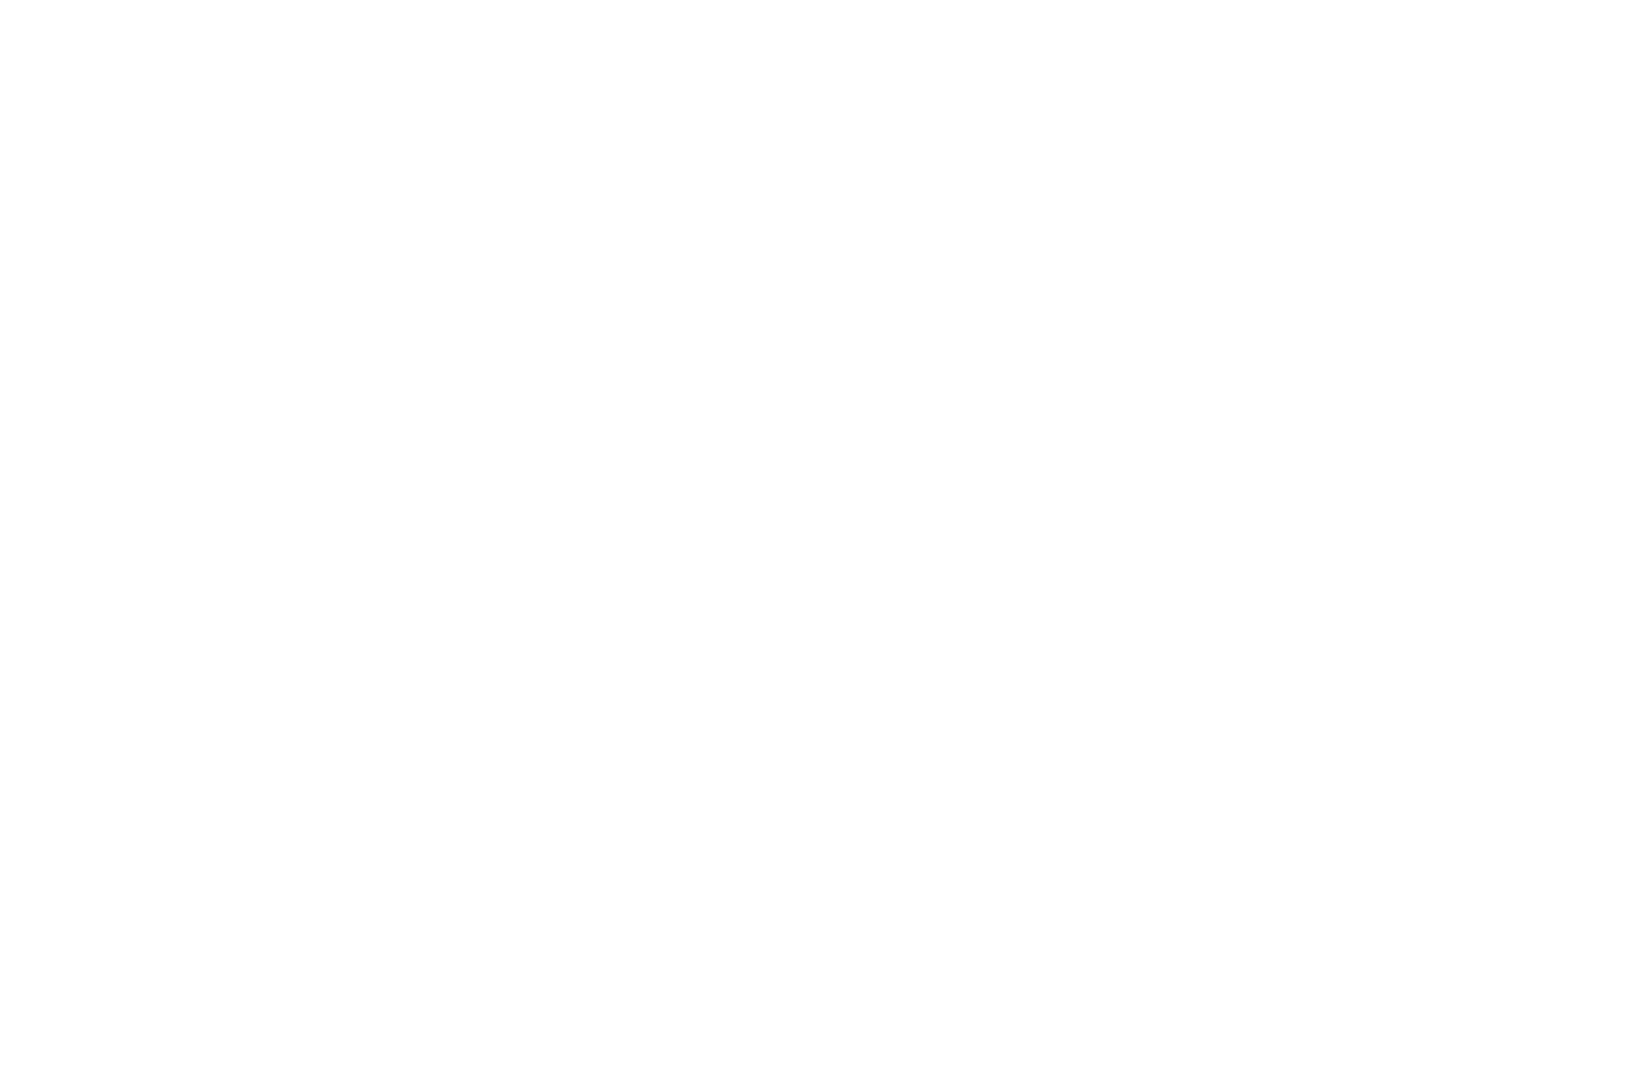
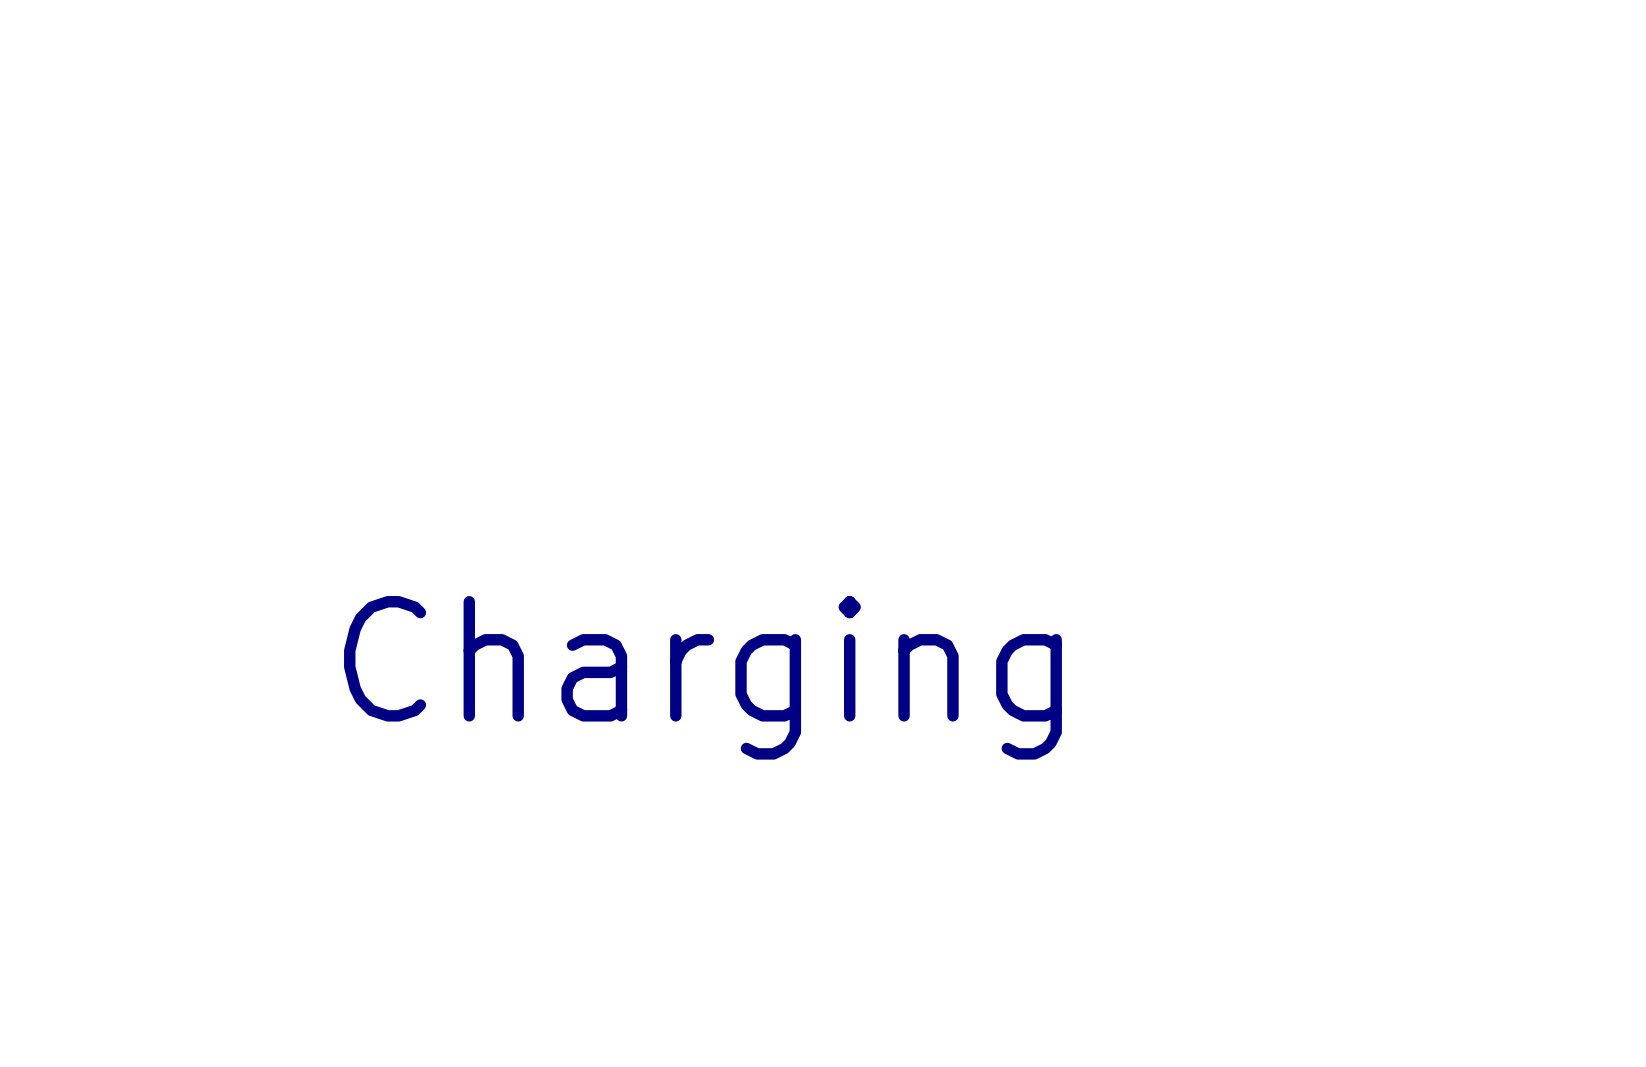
text: none -> Charging (702, 677)

